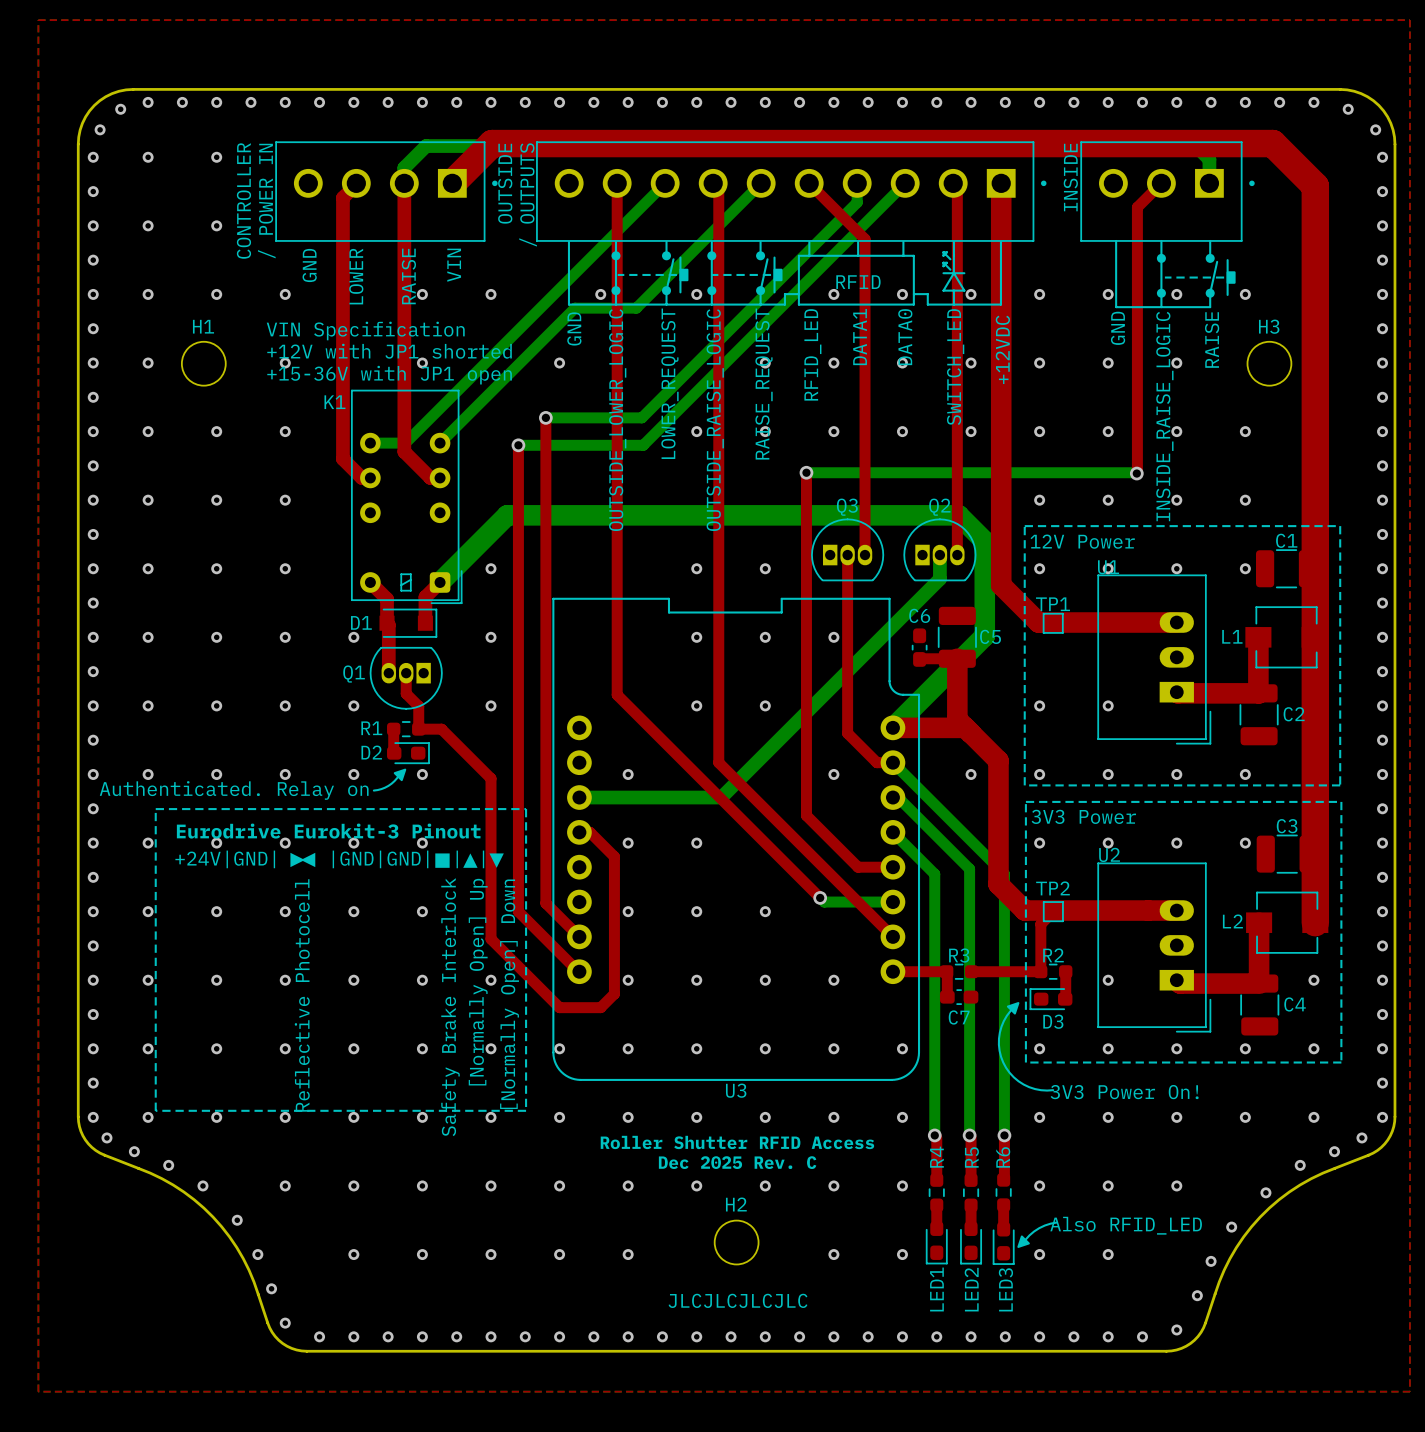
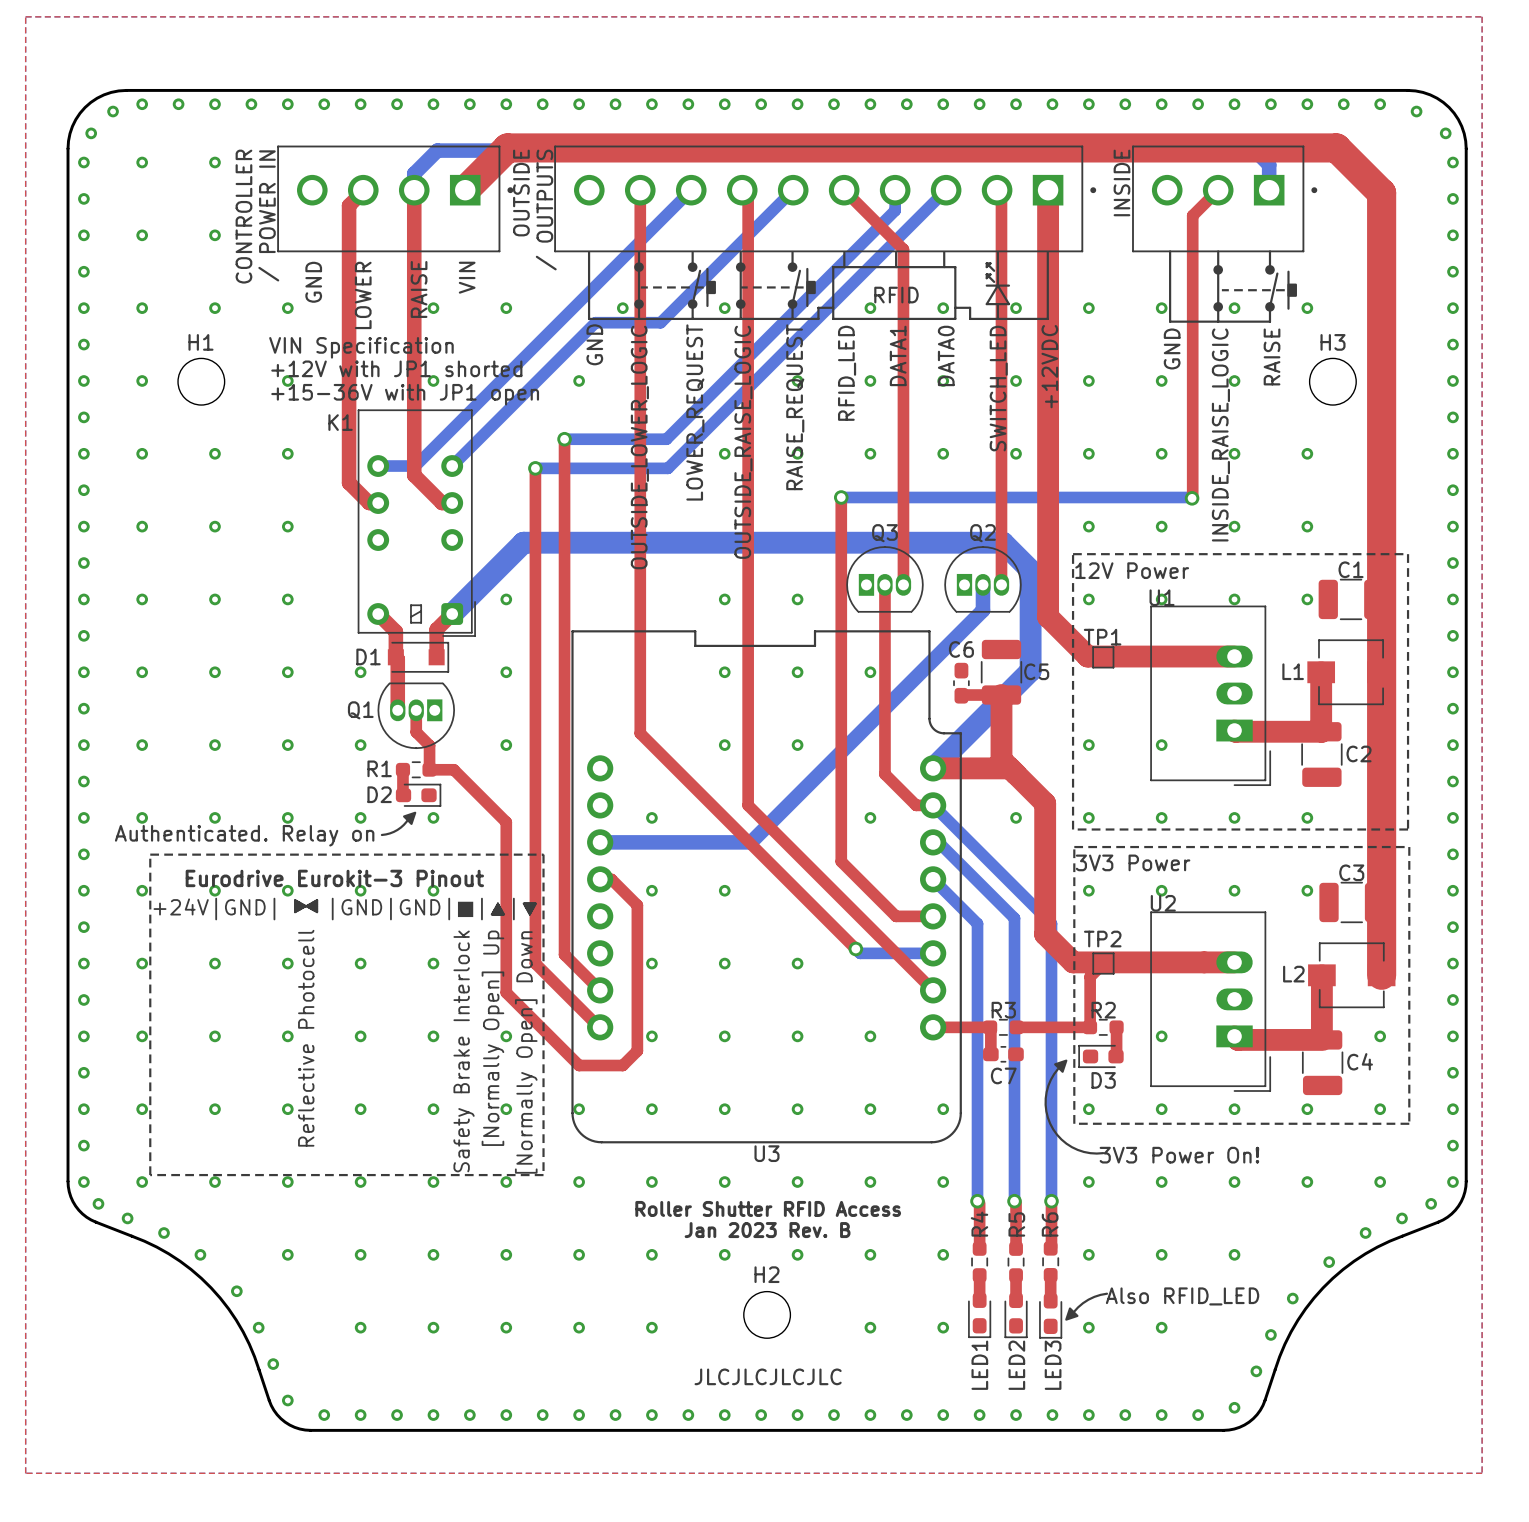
text: Dec 2025 Rev. C (737, 1162) -> Jan 2023 Rev. B (767, 1230)

